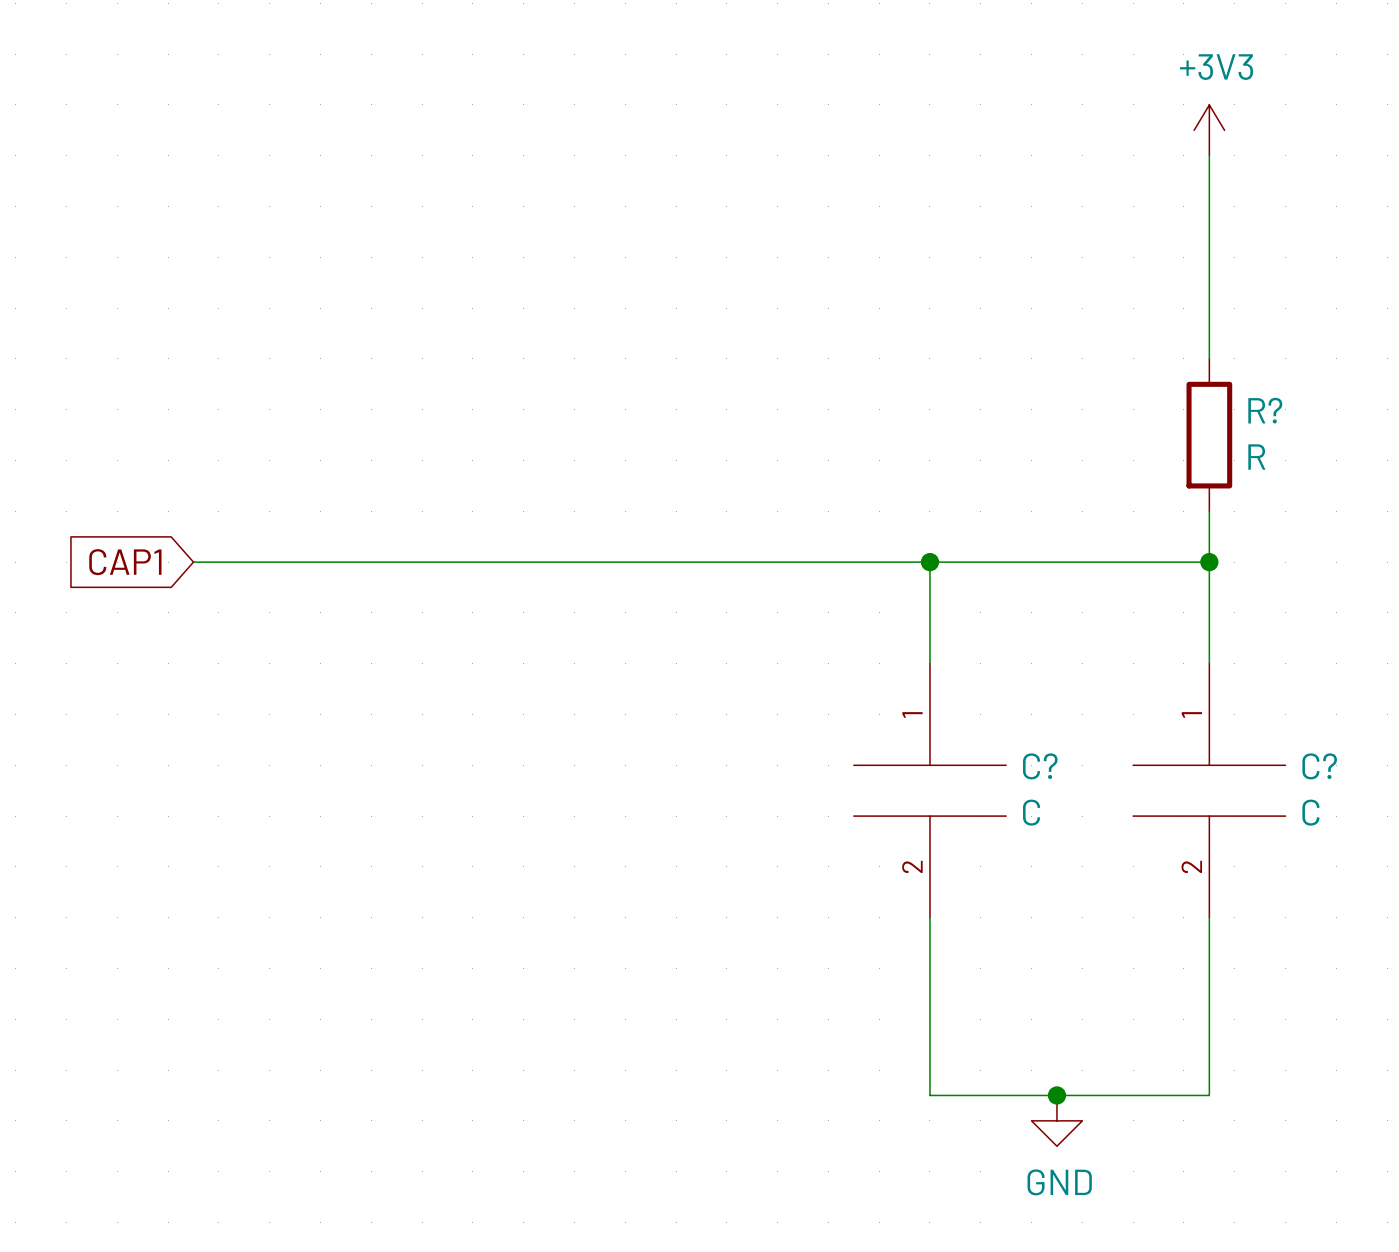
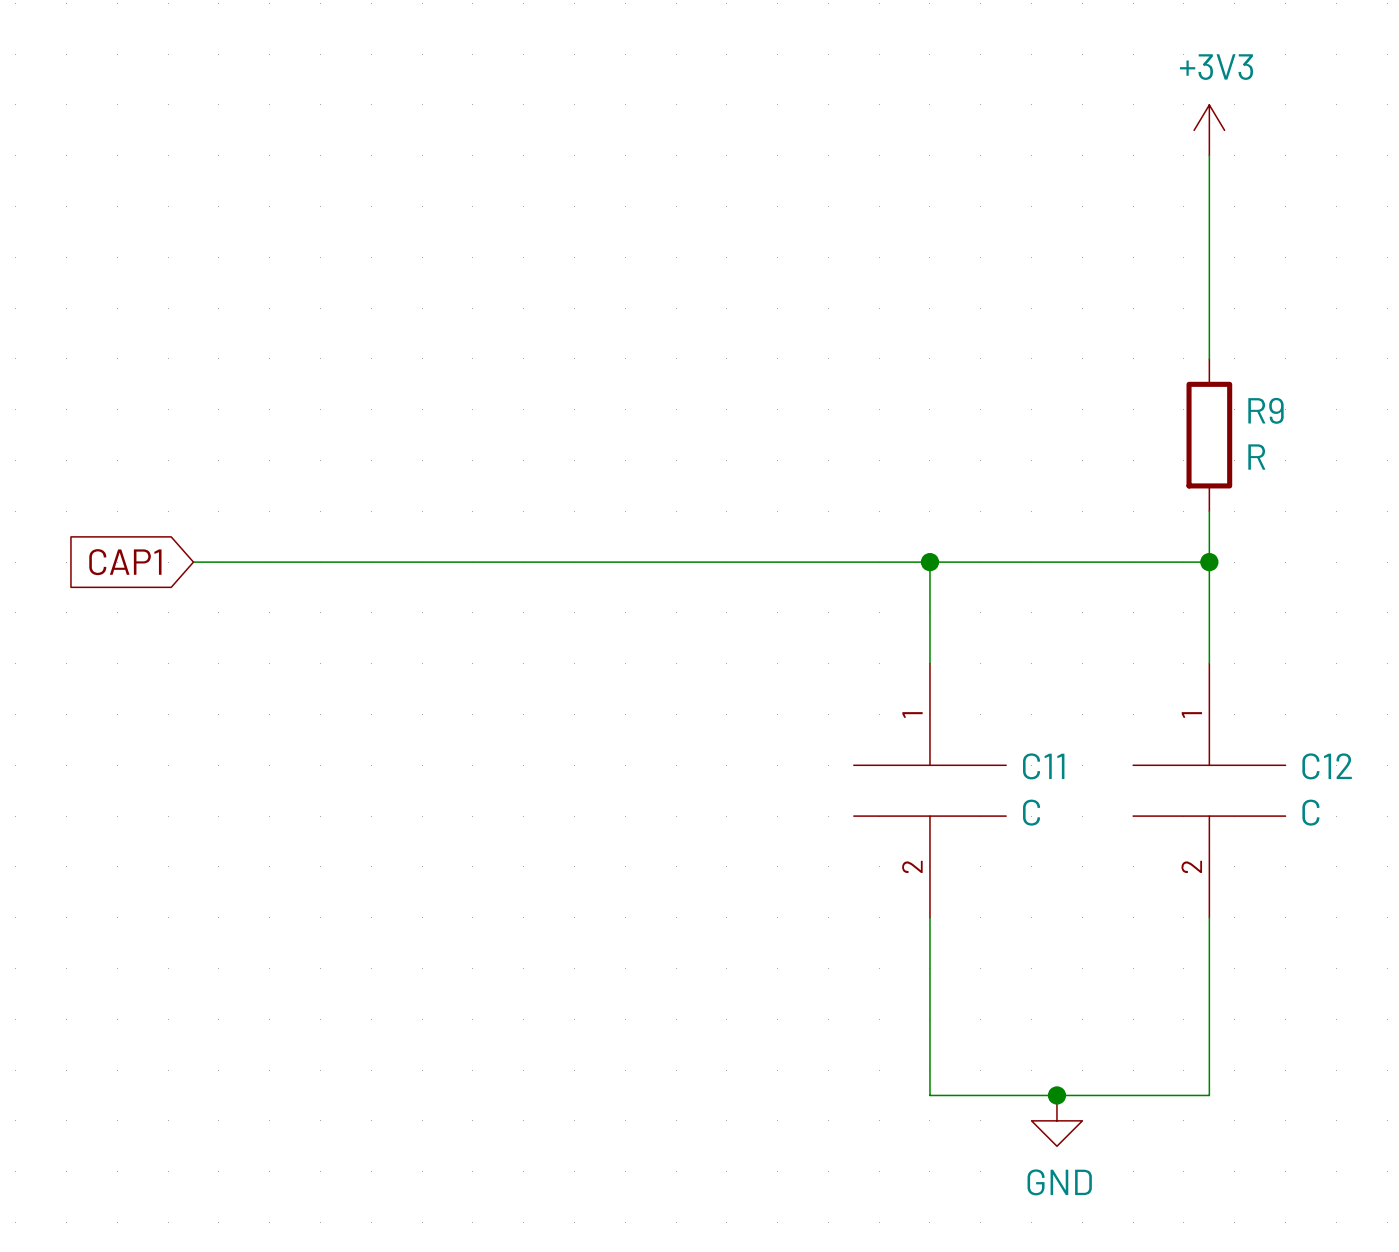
R? name: R? (1265, 410) -> R9 (1265, 410)
C? name: C? (1040, 766) -> C11 (1043, 766)
C? name: C? (1319, 766) -> C12 (1327, 766)

